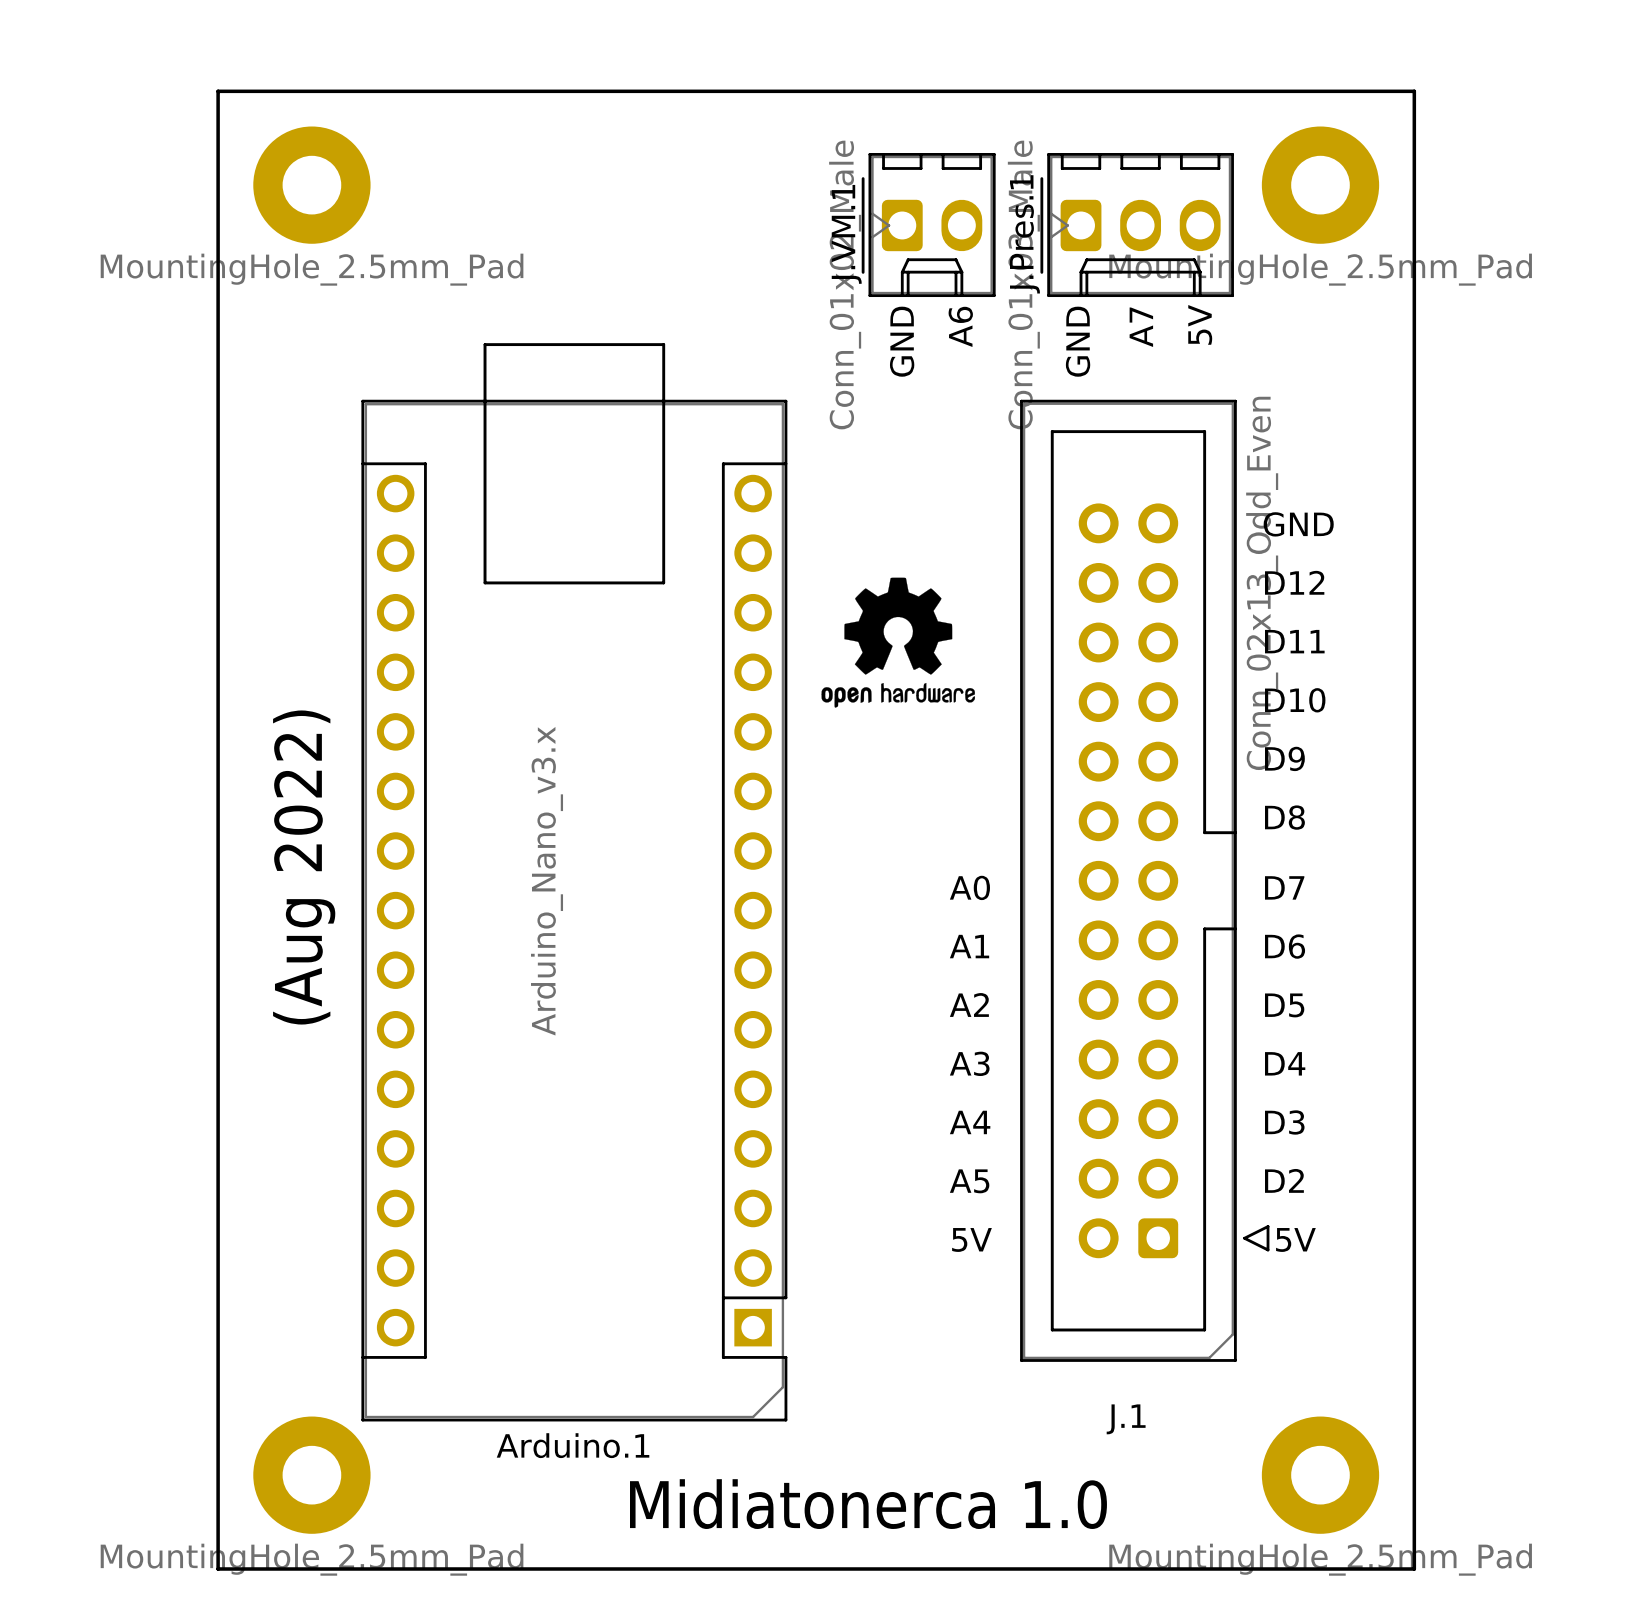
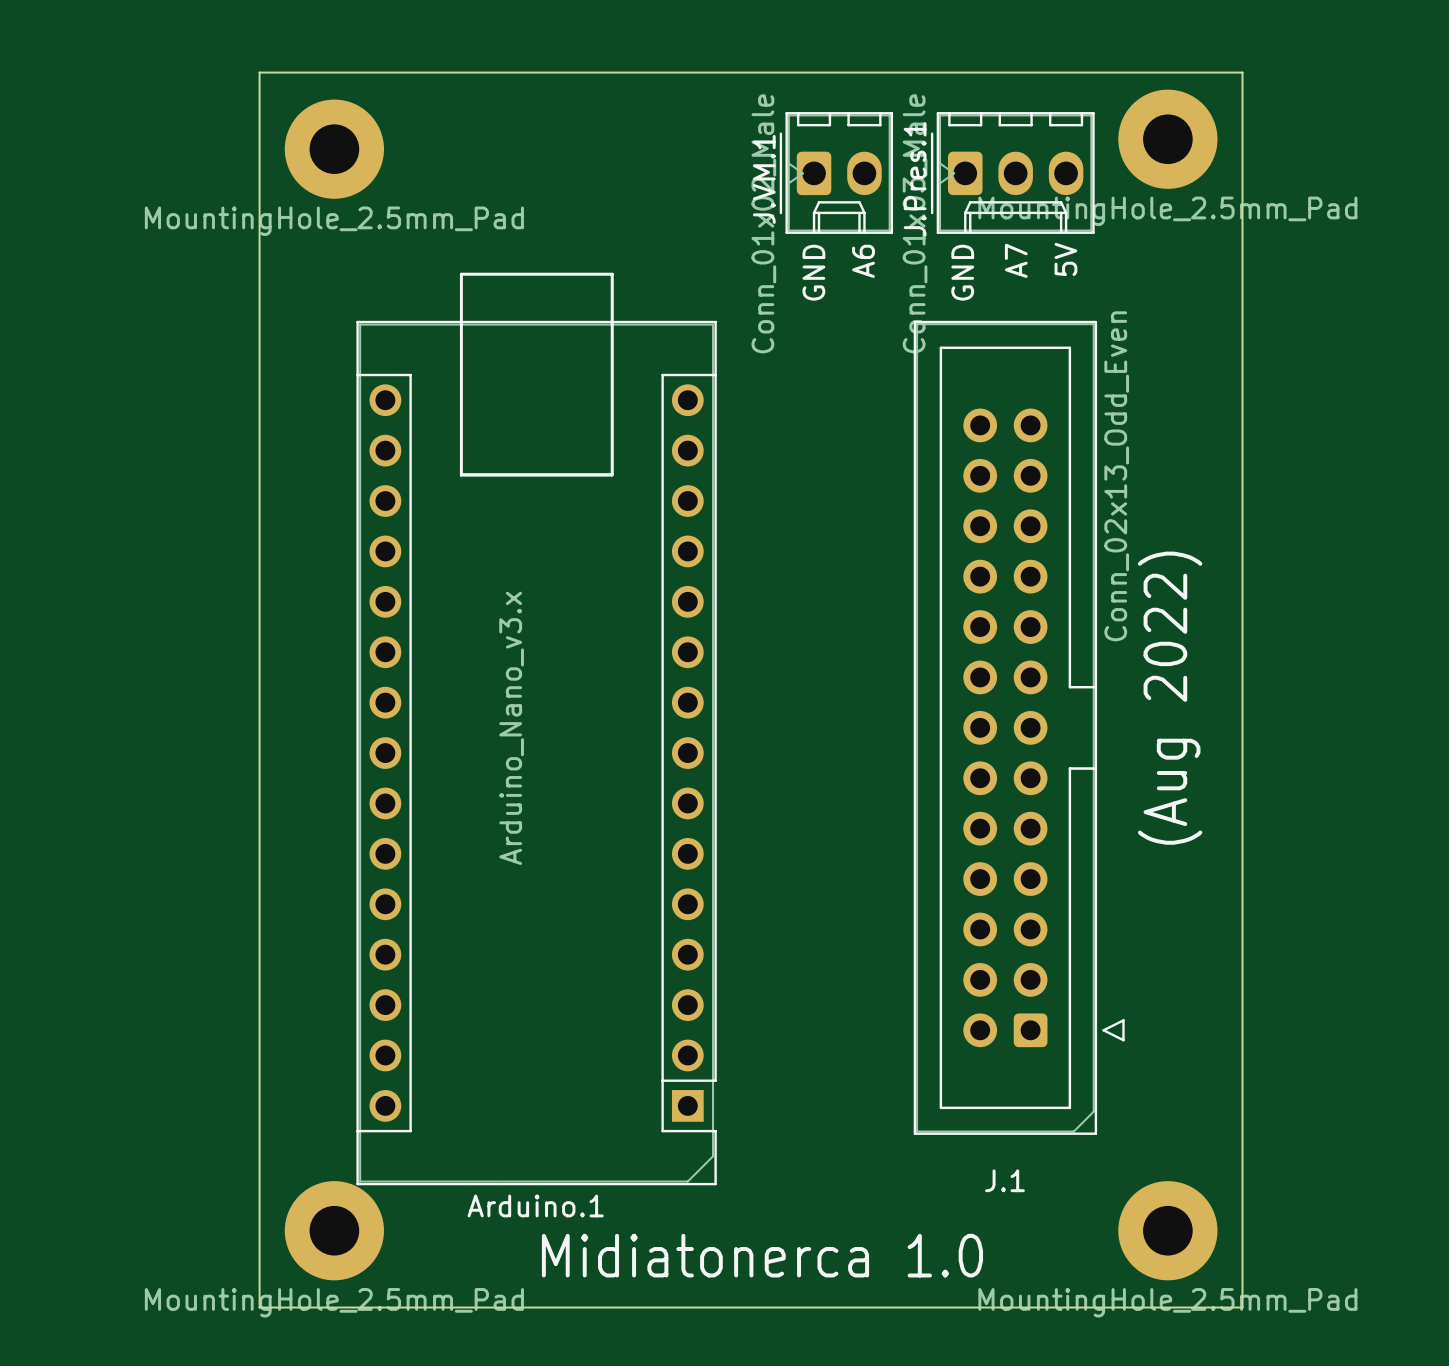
board edge: (218, 91) (1414, 91) (1414, 1568) (218, 1568) (218, 91) -> (259, 72) (259, 1307) (1242, 1307) (1242, 72) (259, 72)
part position: (311, 185) -> (334, 149)
Arduino.1 footprint: [361, 343, 788, 1422] -> [356, 273, 717, 1186]
line: none -> (461, 274) (612, 274) (612, 474) (461, 474) (461, 274)
text: GND (1298, 524) -> none
drawing: [821, 577, 976, 708] -> none
text: D12 (1294, 582) -> none
text: D11 (1294, 641) -> none
text: D10 (1295, 700) -> none
text: D9 (1284, 758) -> none
text: D8 (1284, 817) -> none
text: (Aug 2022) (304, 867) -> none
text: none -> (Aug 2022) (1170, 698)
text: A0 (969, 887) -> none
text: D7 (1284, 887) -> none
text: A1 (969, 946) -> none
text: D6 (1285, 946) -> none
text: A2 (969, 1004) -> none
text: D5 (1284, 1005) -> none
text: A3 (969, 1063) -> none
text: D4 (1285, 1063) -> none
text: A4 (970, 1122) -> none
text: D3 (1284, 1122) -> none
text: D2 (1284, 1180) -> none
text: A5 (969, 1181) -> none
text: 5V (971, 1239) -> none
text: 5V (1295, 1239) -> none
part position: (311, 1475) -> (334, 1230)

